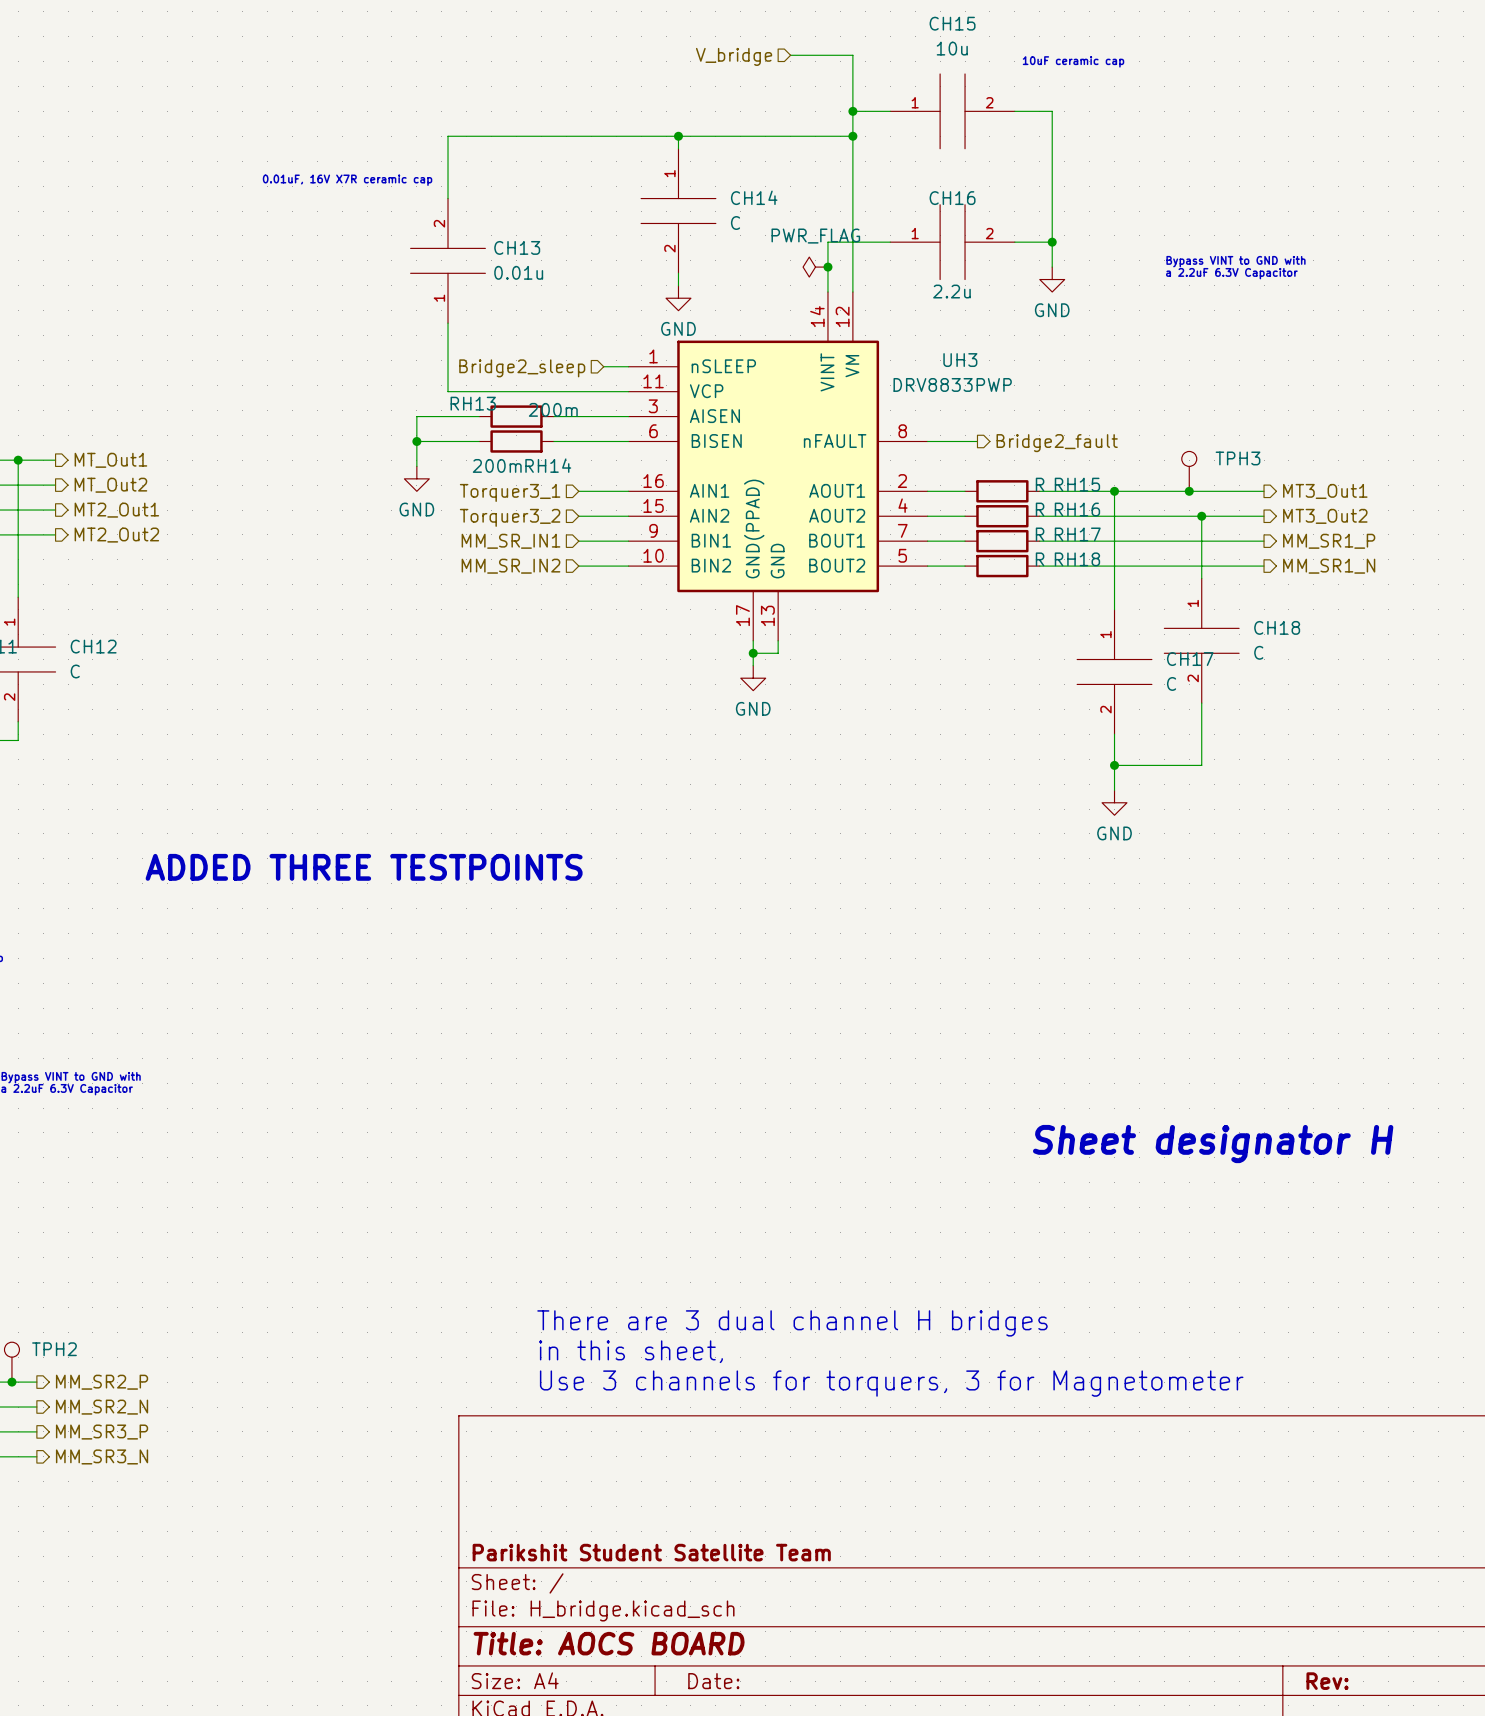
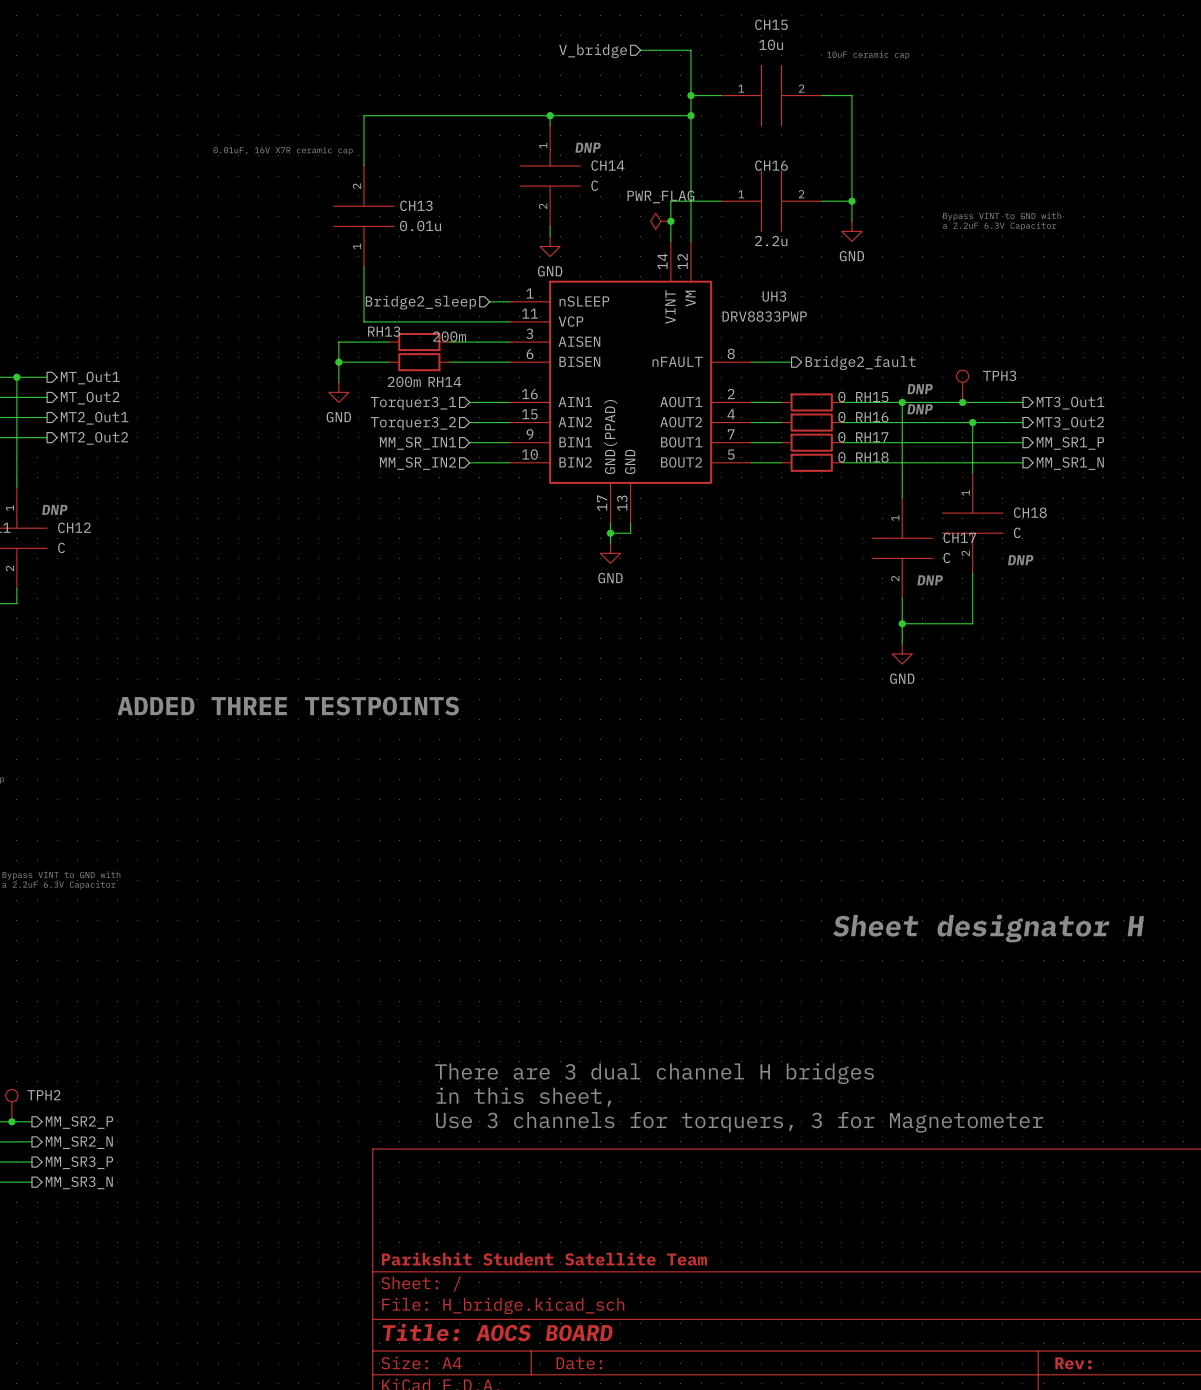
text: none -> DNP (588, 147)
text: none -> DNP (920, 389)
RH15 value: R (1040, 484) -> 0 (841, 397)
text: none -> DNP (920, 409)
RH16 value: R (1040, 509) -> 0 (841, 417)
RH17 value: R (1040, 534) -> 0 (841, 437)
RH18 value: R (1040, 559) -> 0 (841, 457)
text: none -> DNP (54, 509)
text: none -> DNP (1020, 560)
text: none -> DNP (930, 580)

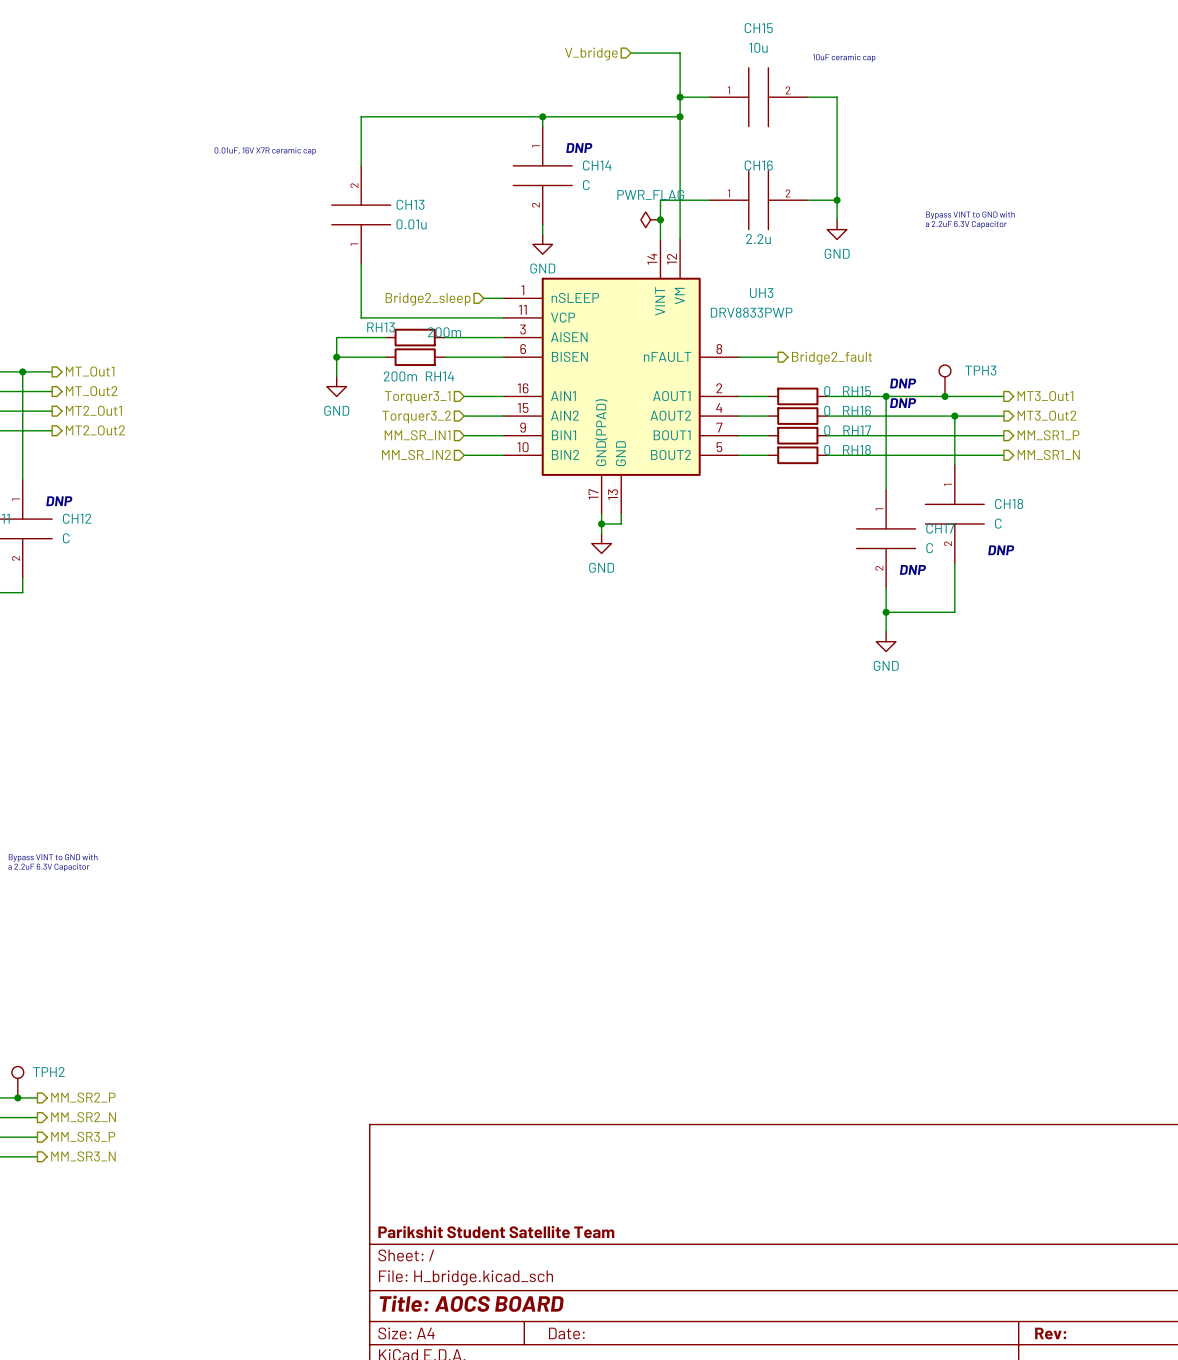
text: ADDED THREE TESTPOINTS (288, 706) -> none
text: Sheet designator H (988, 928) -> none
text: There are 3 dual channel H bridges (654, 1073) -> none
text: in this sheet, (524, 1097) -> none
text: Use 3 channels for torquers, 3 for Magnetometer (739, 1122) -> none

